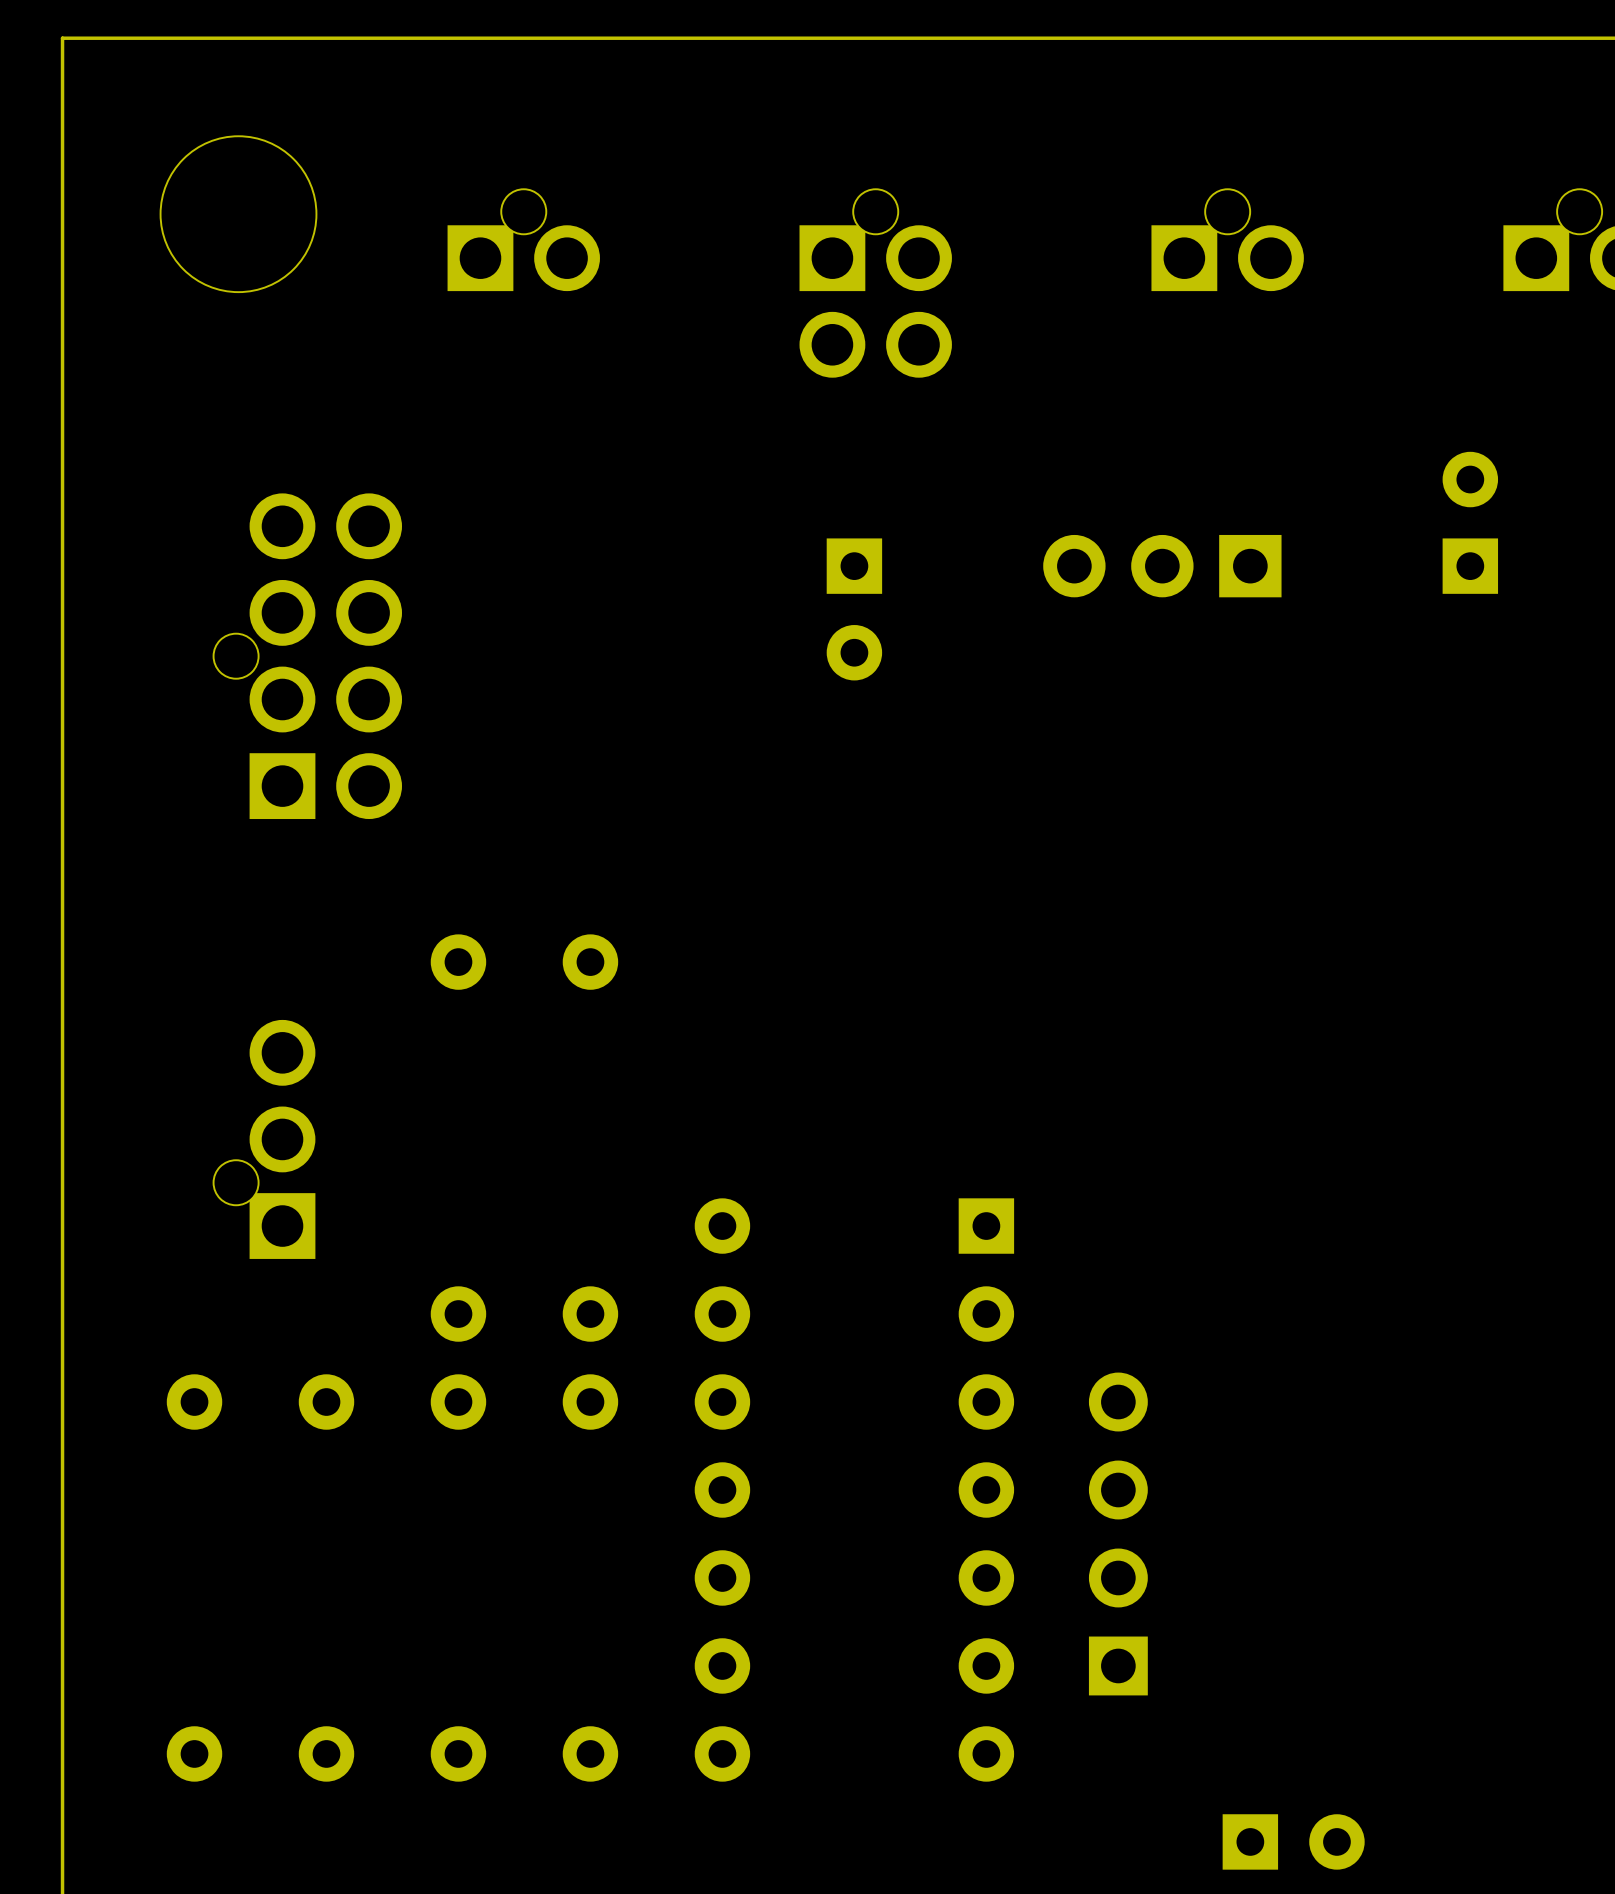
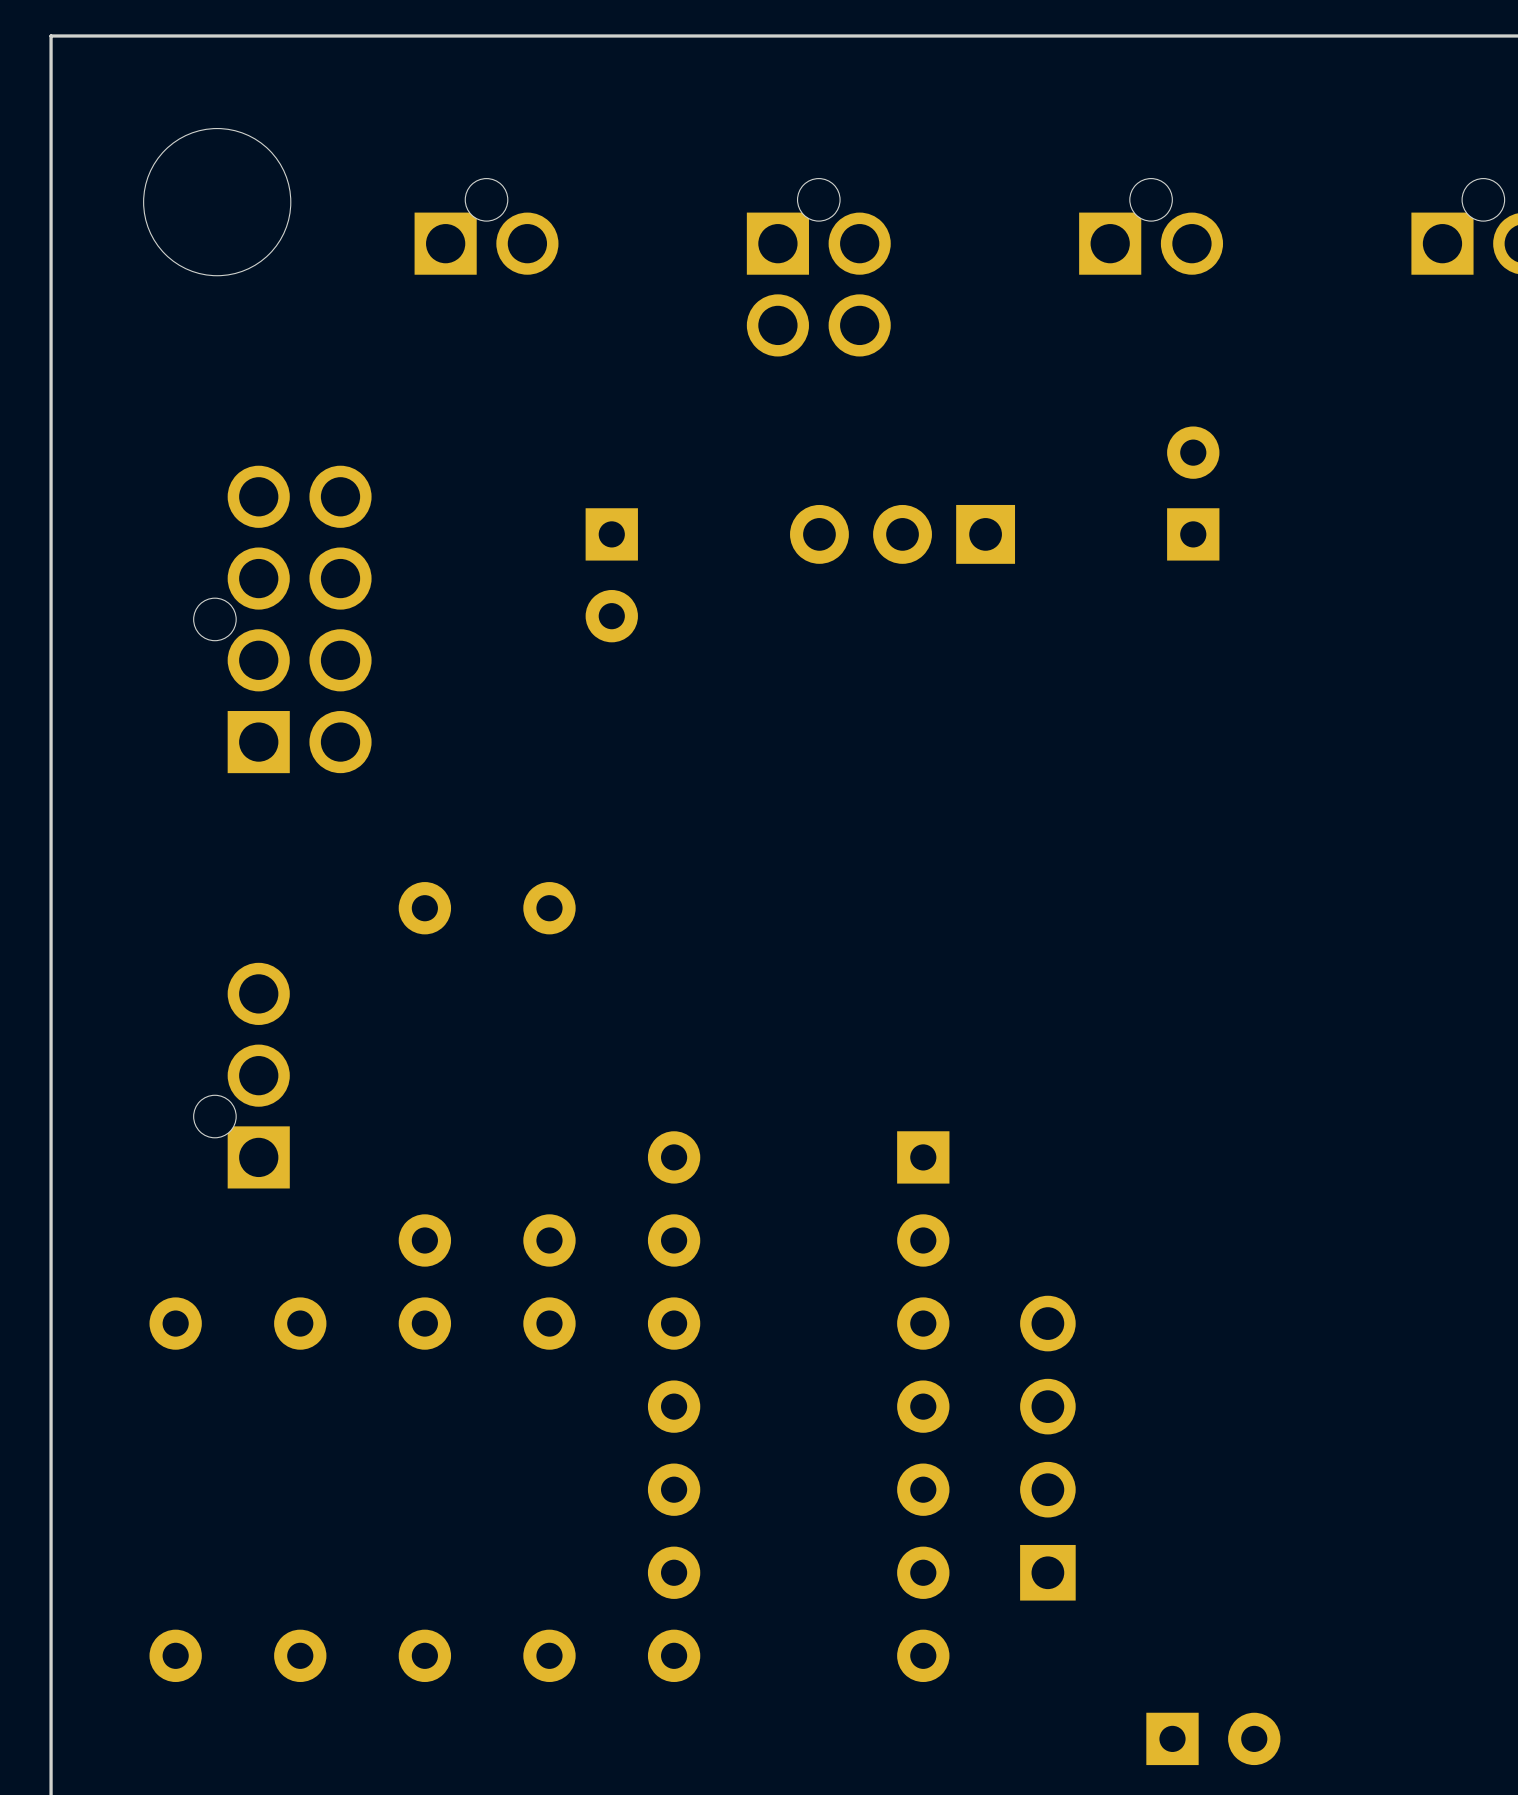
part position: (1470, 522) -> (1193, 493)
part position: (1162, 566) -> (902, 534)
part position: (854, 609) -> (611, 575)

